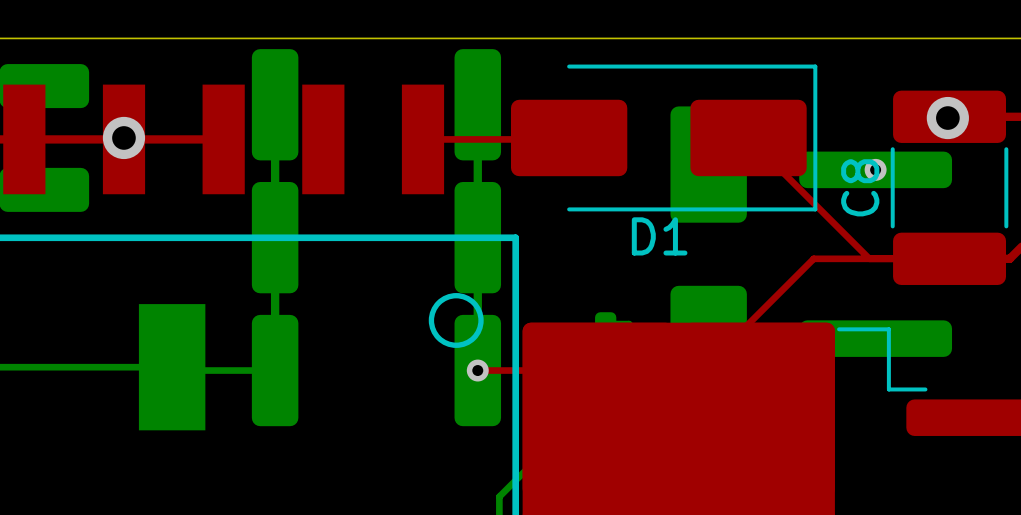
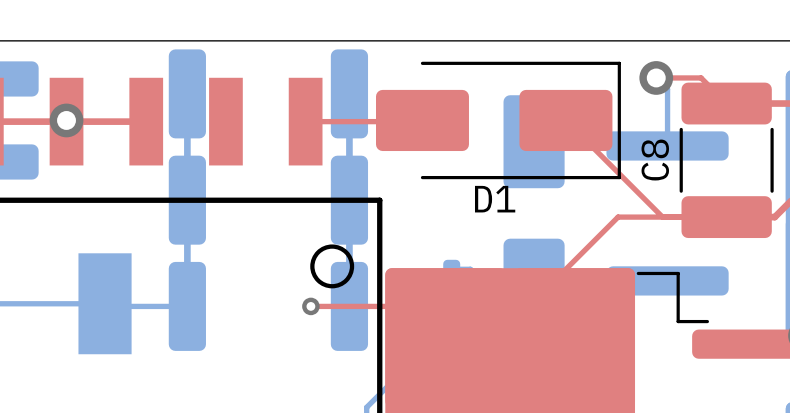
top track: none -> (656, 77) (701, 77) (726, 103)
bottom track: none -> (656, 77) (667, 89) (667, 145)
via position: (947, 118) -> (656, 77)
via: (875, 169) -> none
top track: none -> (310, 306) (349, 306)
via position: (477, 370) -> (310, 306)

